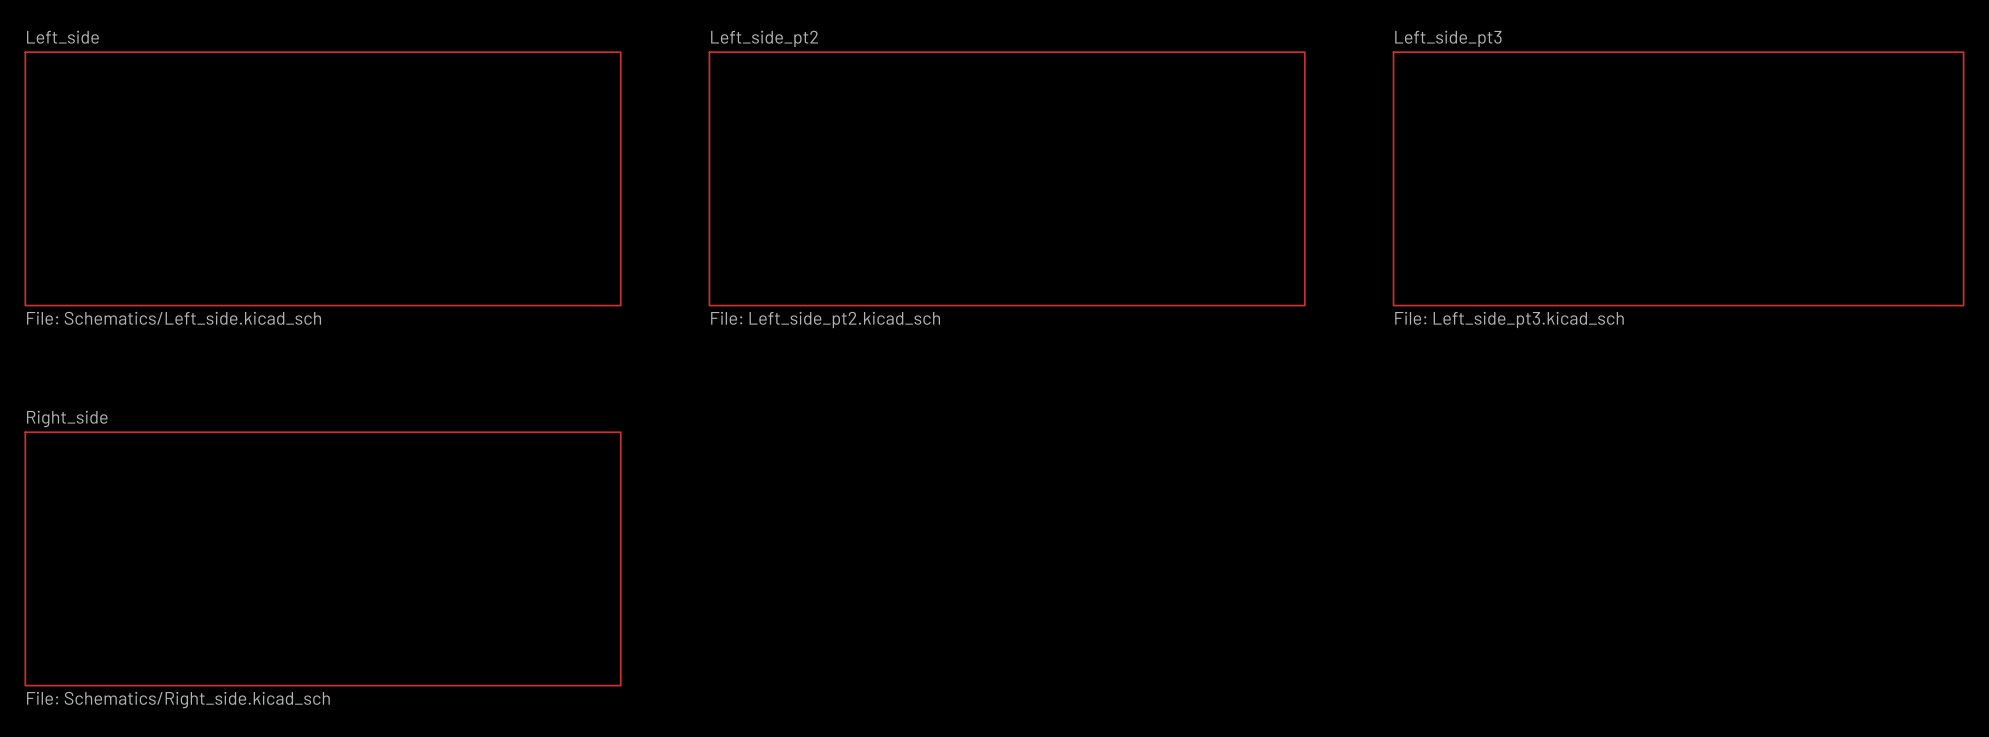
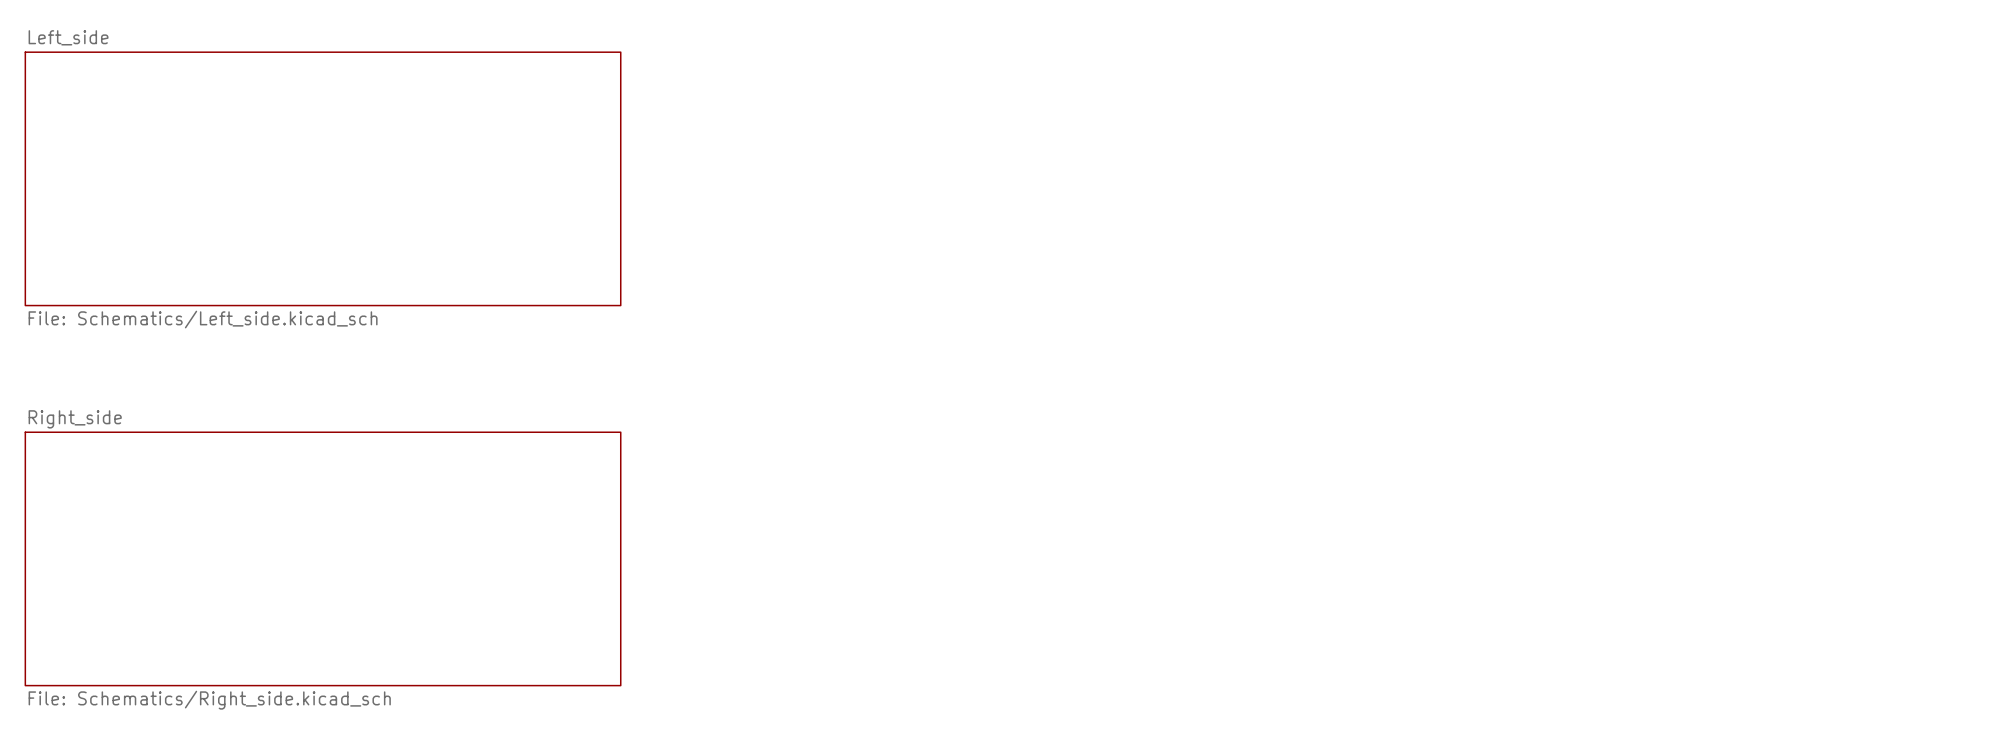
sheet Left_side_pt2: File: Left_side_pt2.kicad_sch (1007, 178) -> none
sheet Left_side_pt3: File: Left_side_pt3.kicad_sch (1678, 178) -> none

